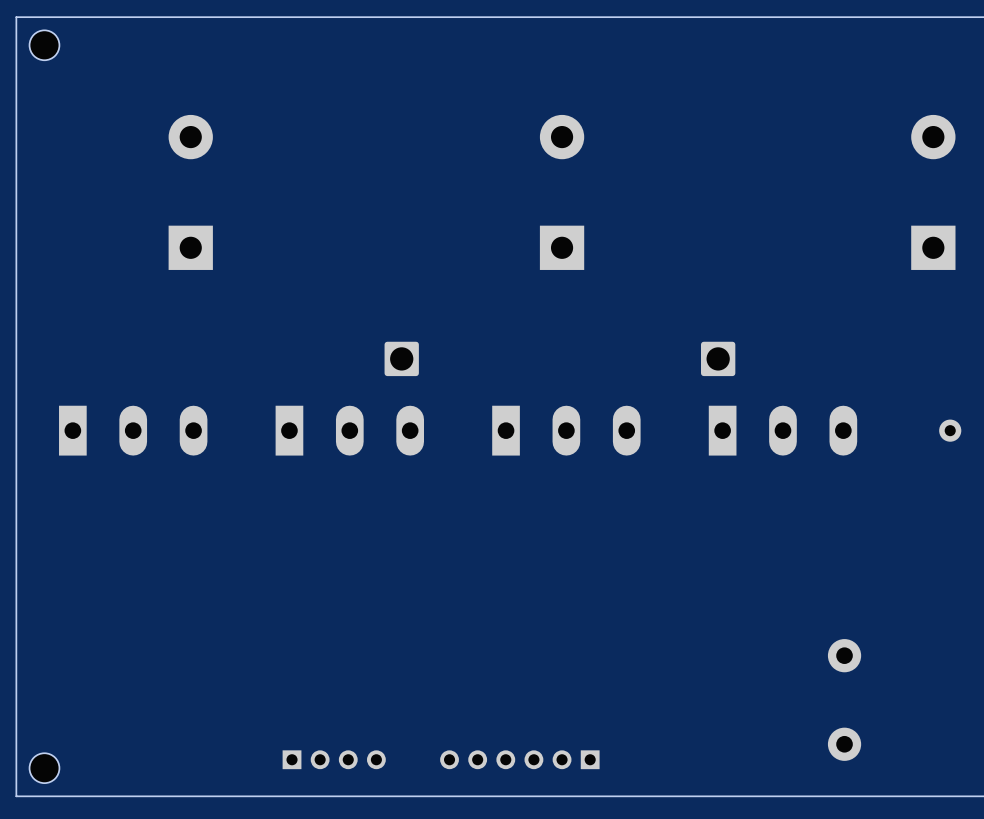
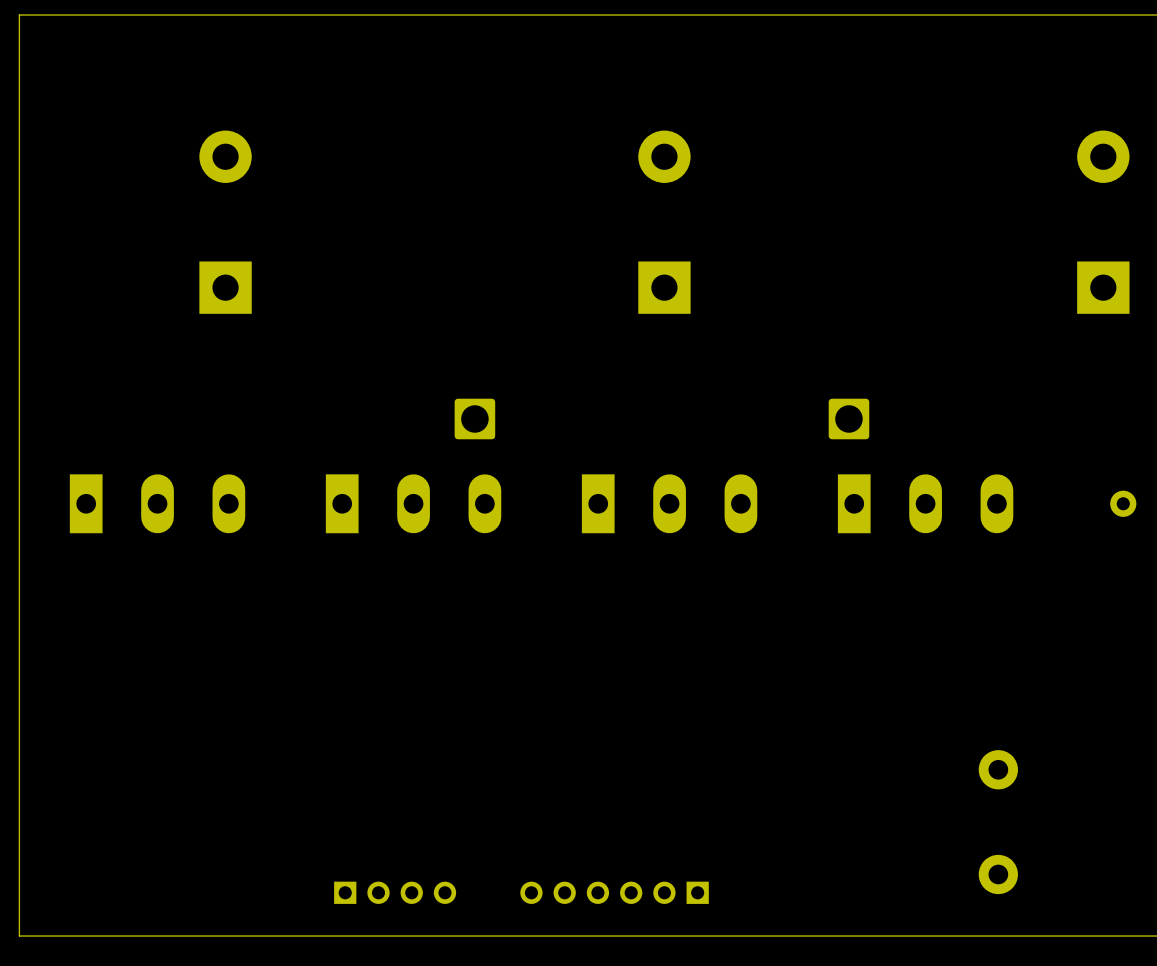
part: (44, 45) -> none
part: (44, 768) -> none

